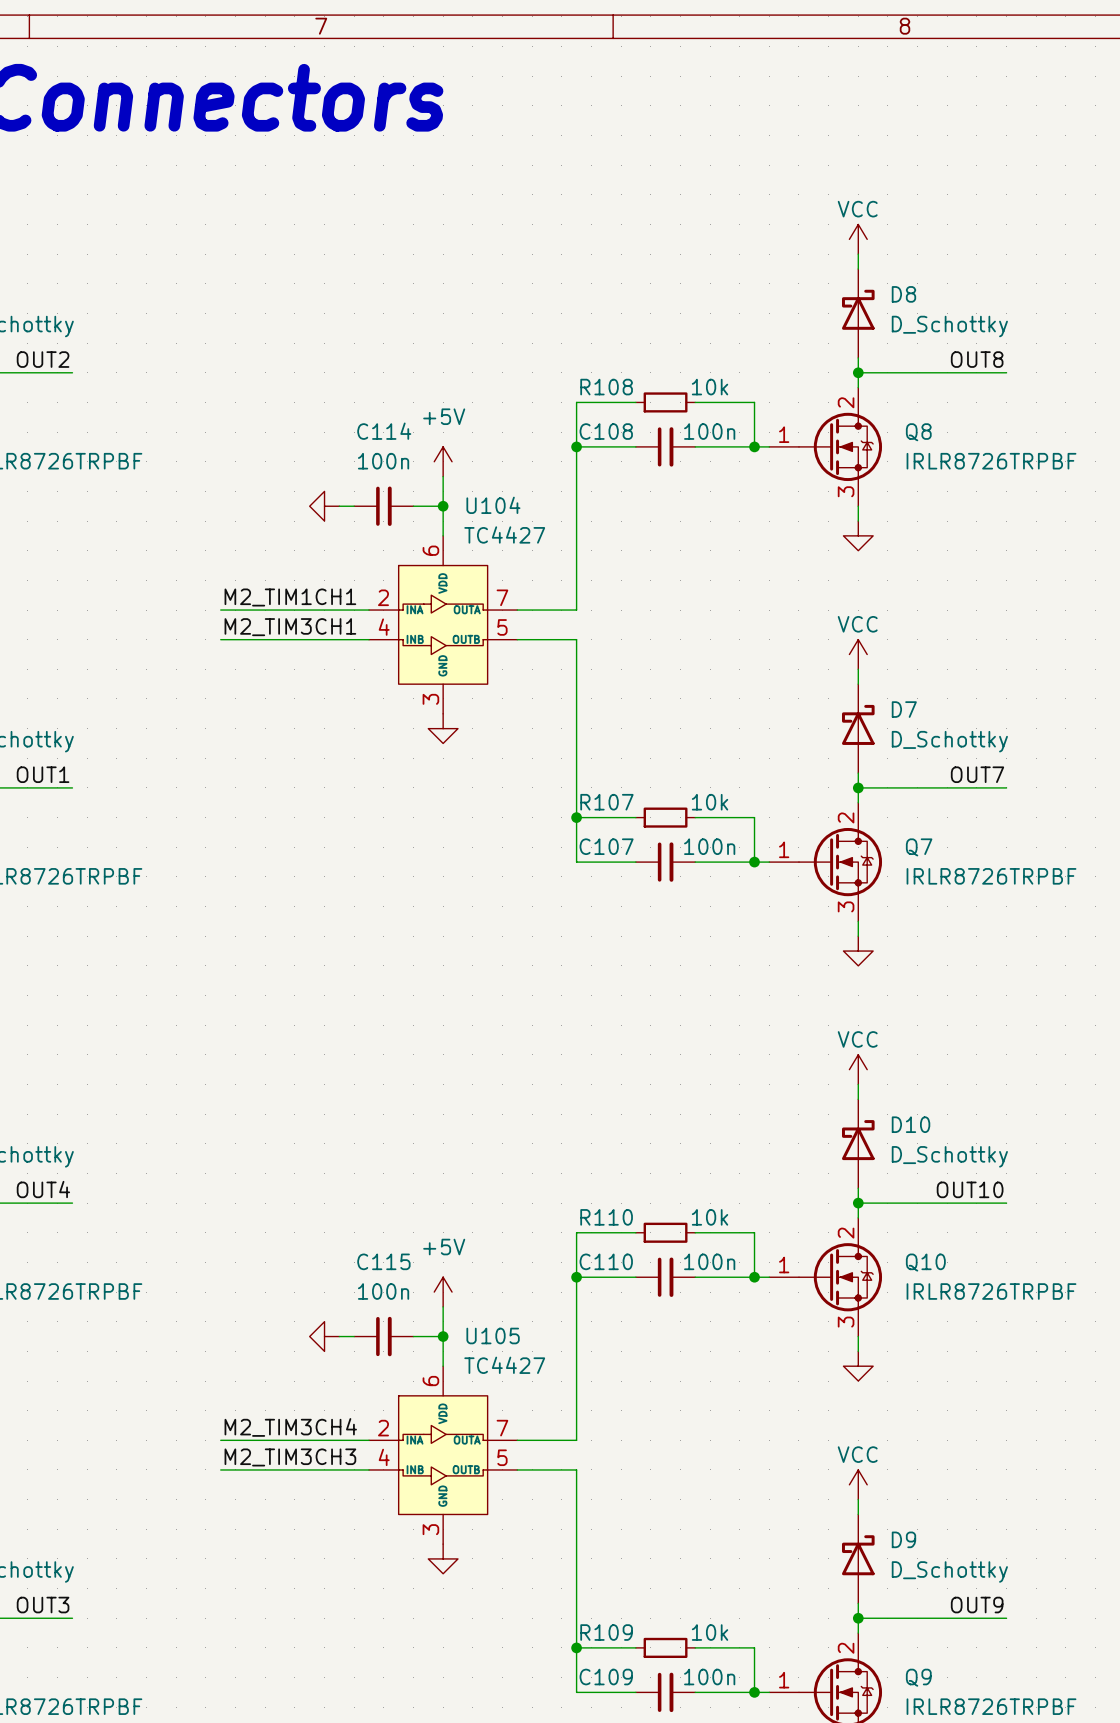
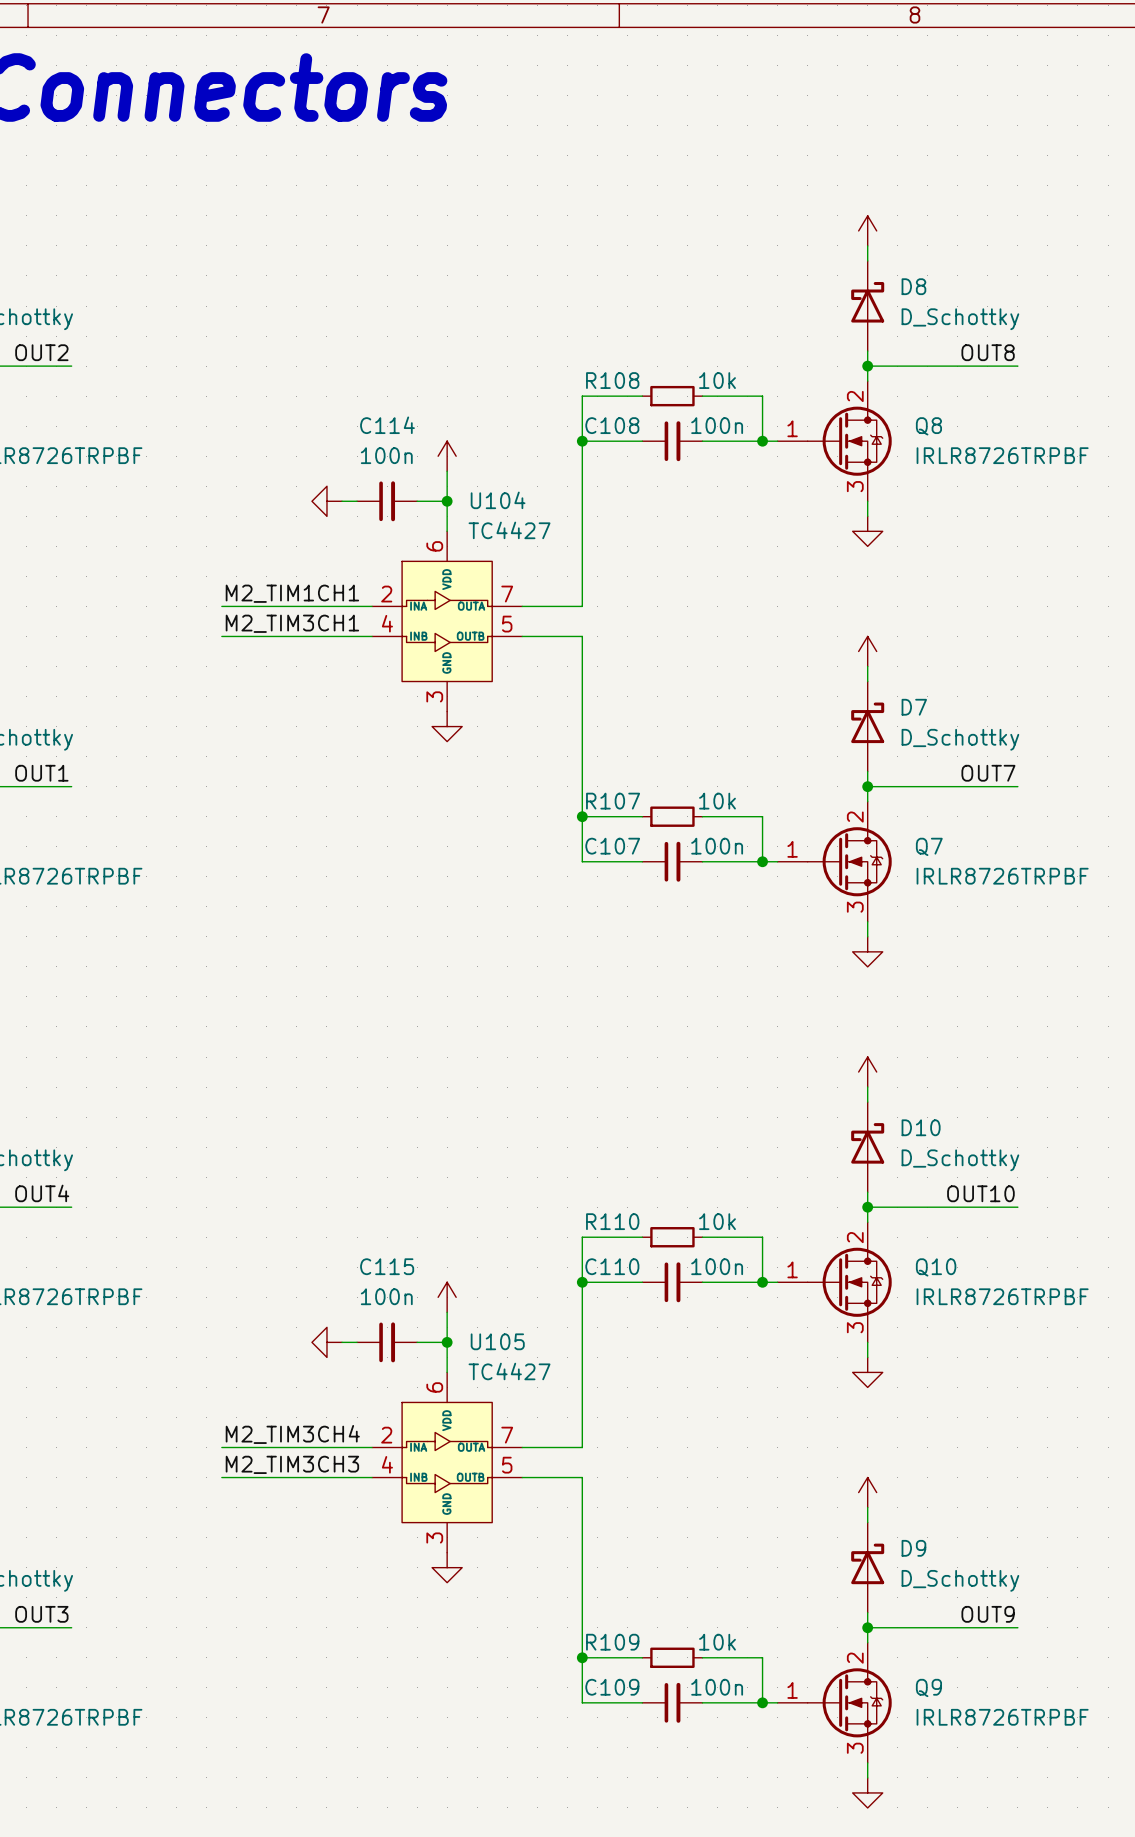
power symbol text: VCC (857, 209) -> none
power symbol text: +5V (444, 416) -> none
power symbol text: VCC (857, 624) -> none
power symbol text: VCC (857, 1039) -> none
power symbol text: +5V (444, 1247) -> none
power symbol text: VCC (857, 1454) -> none

